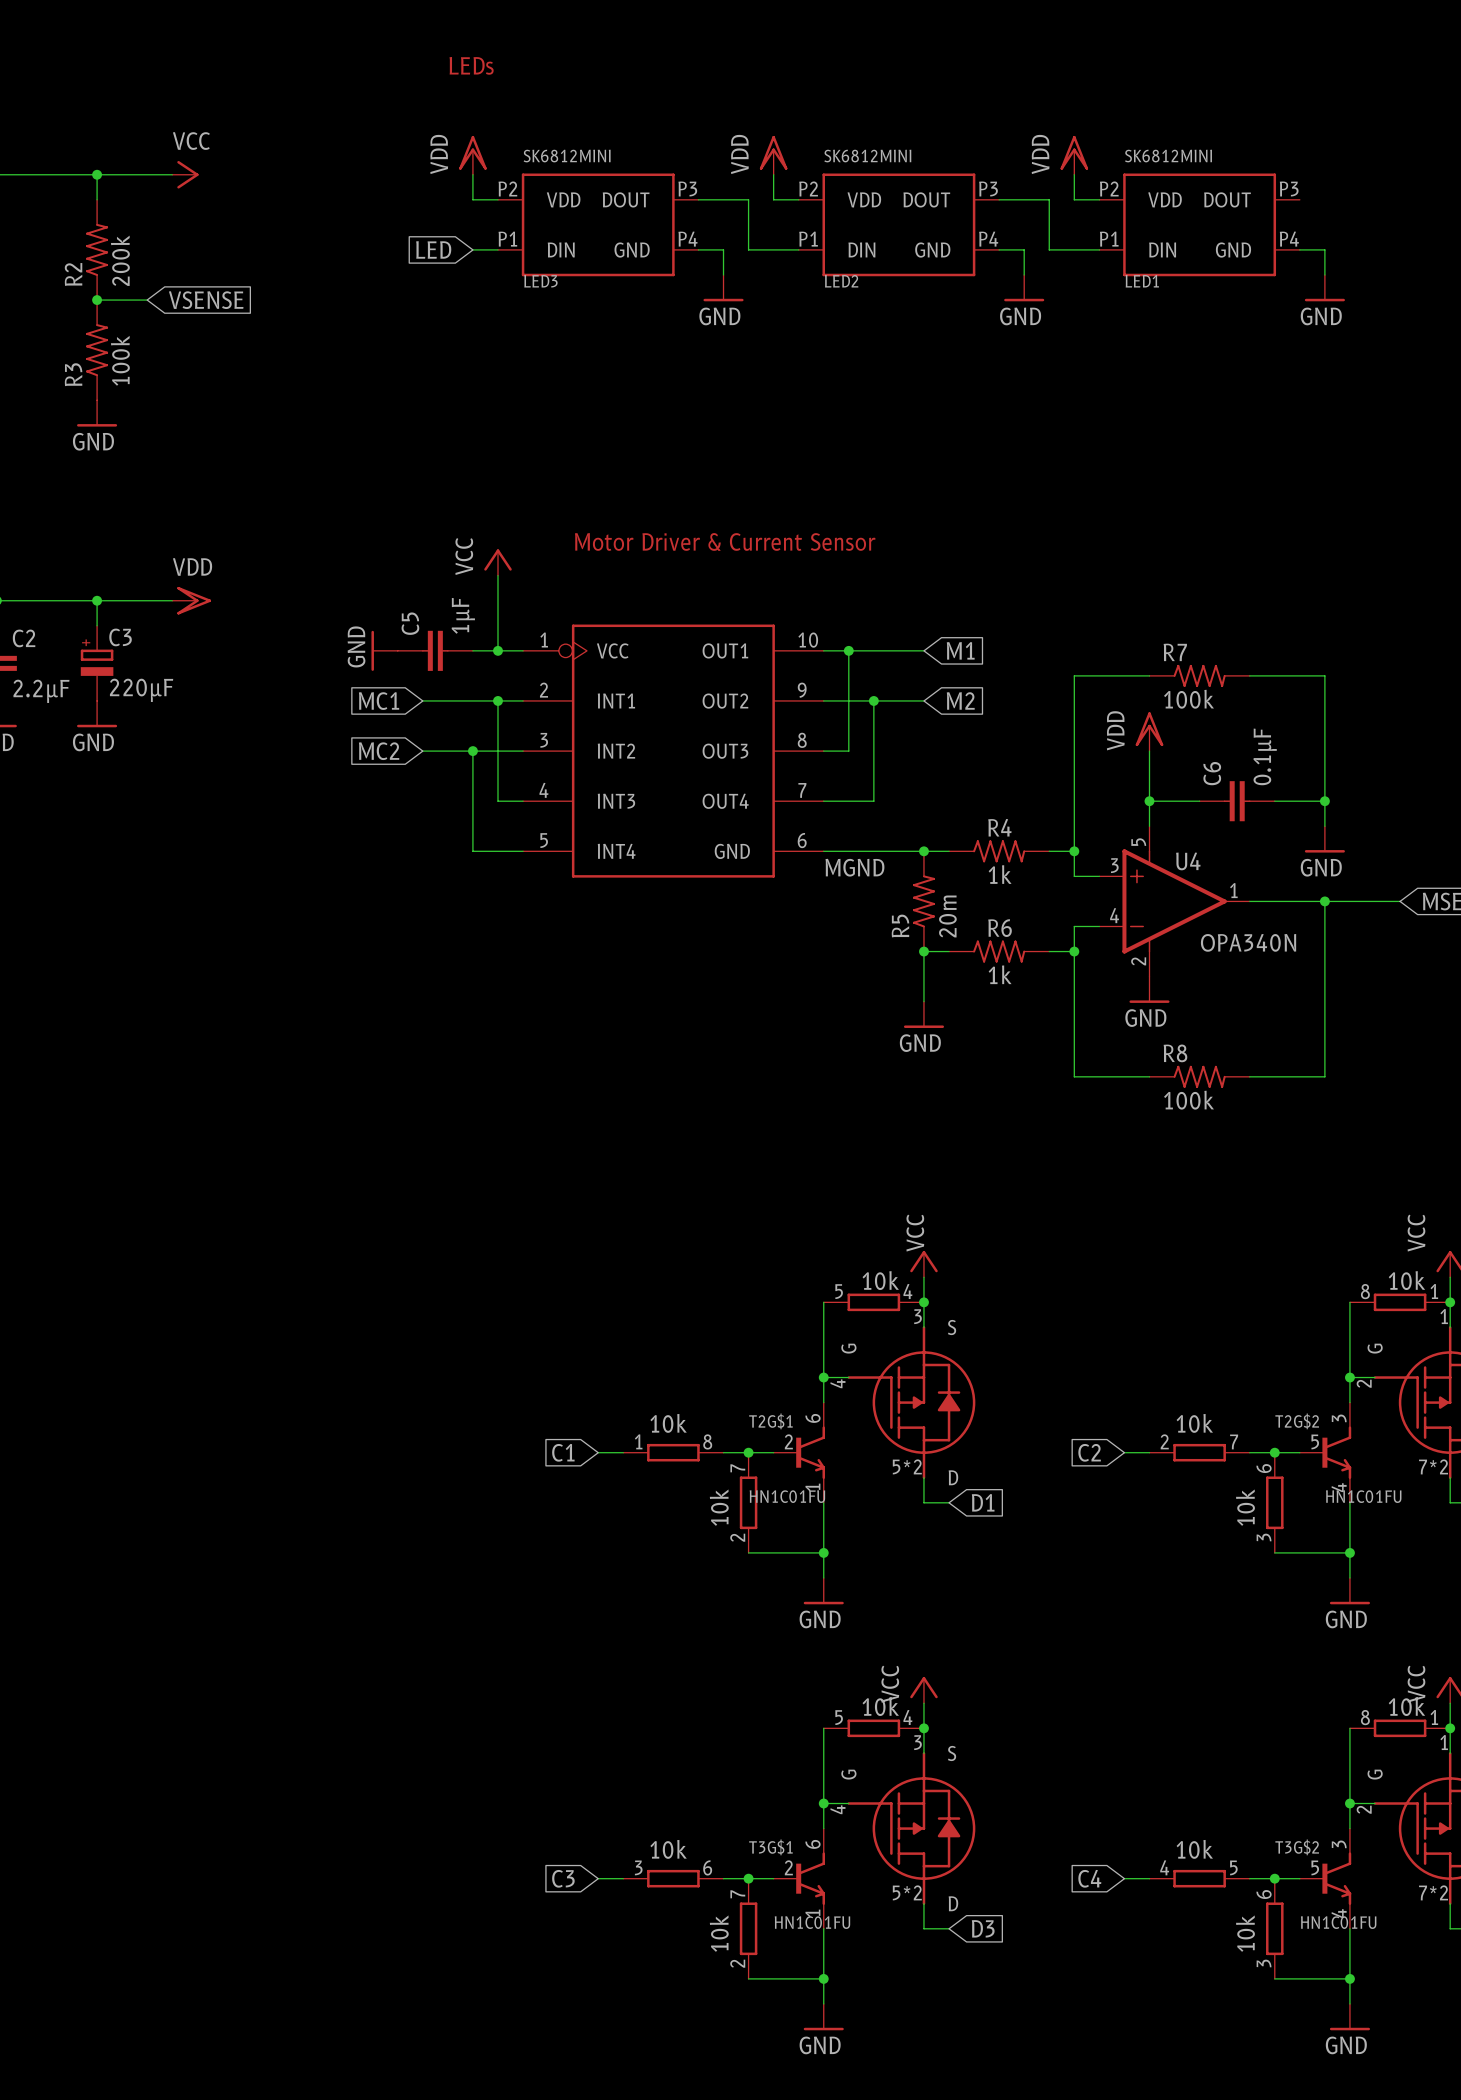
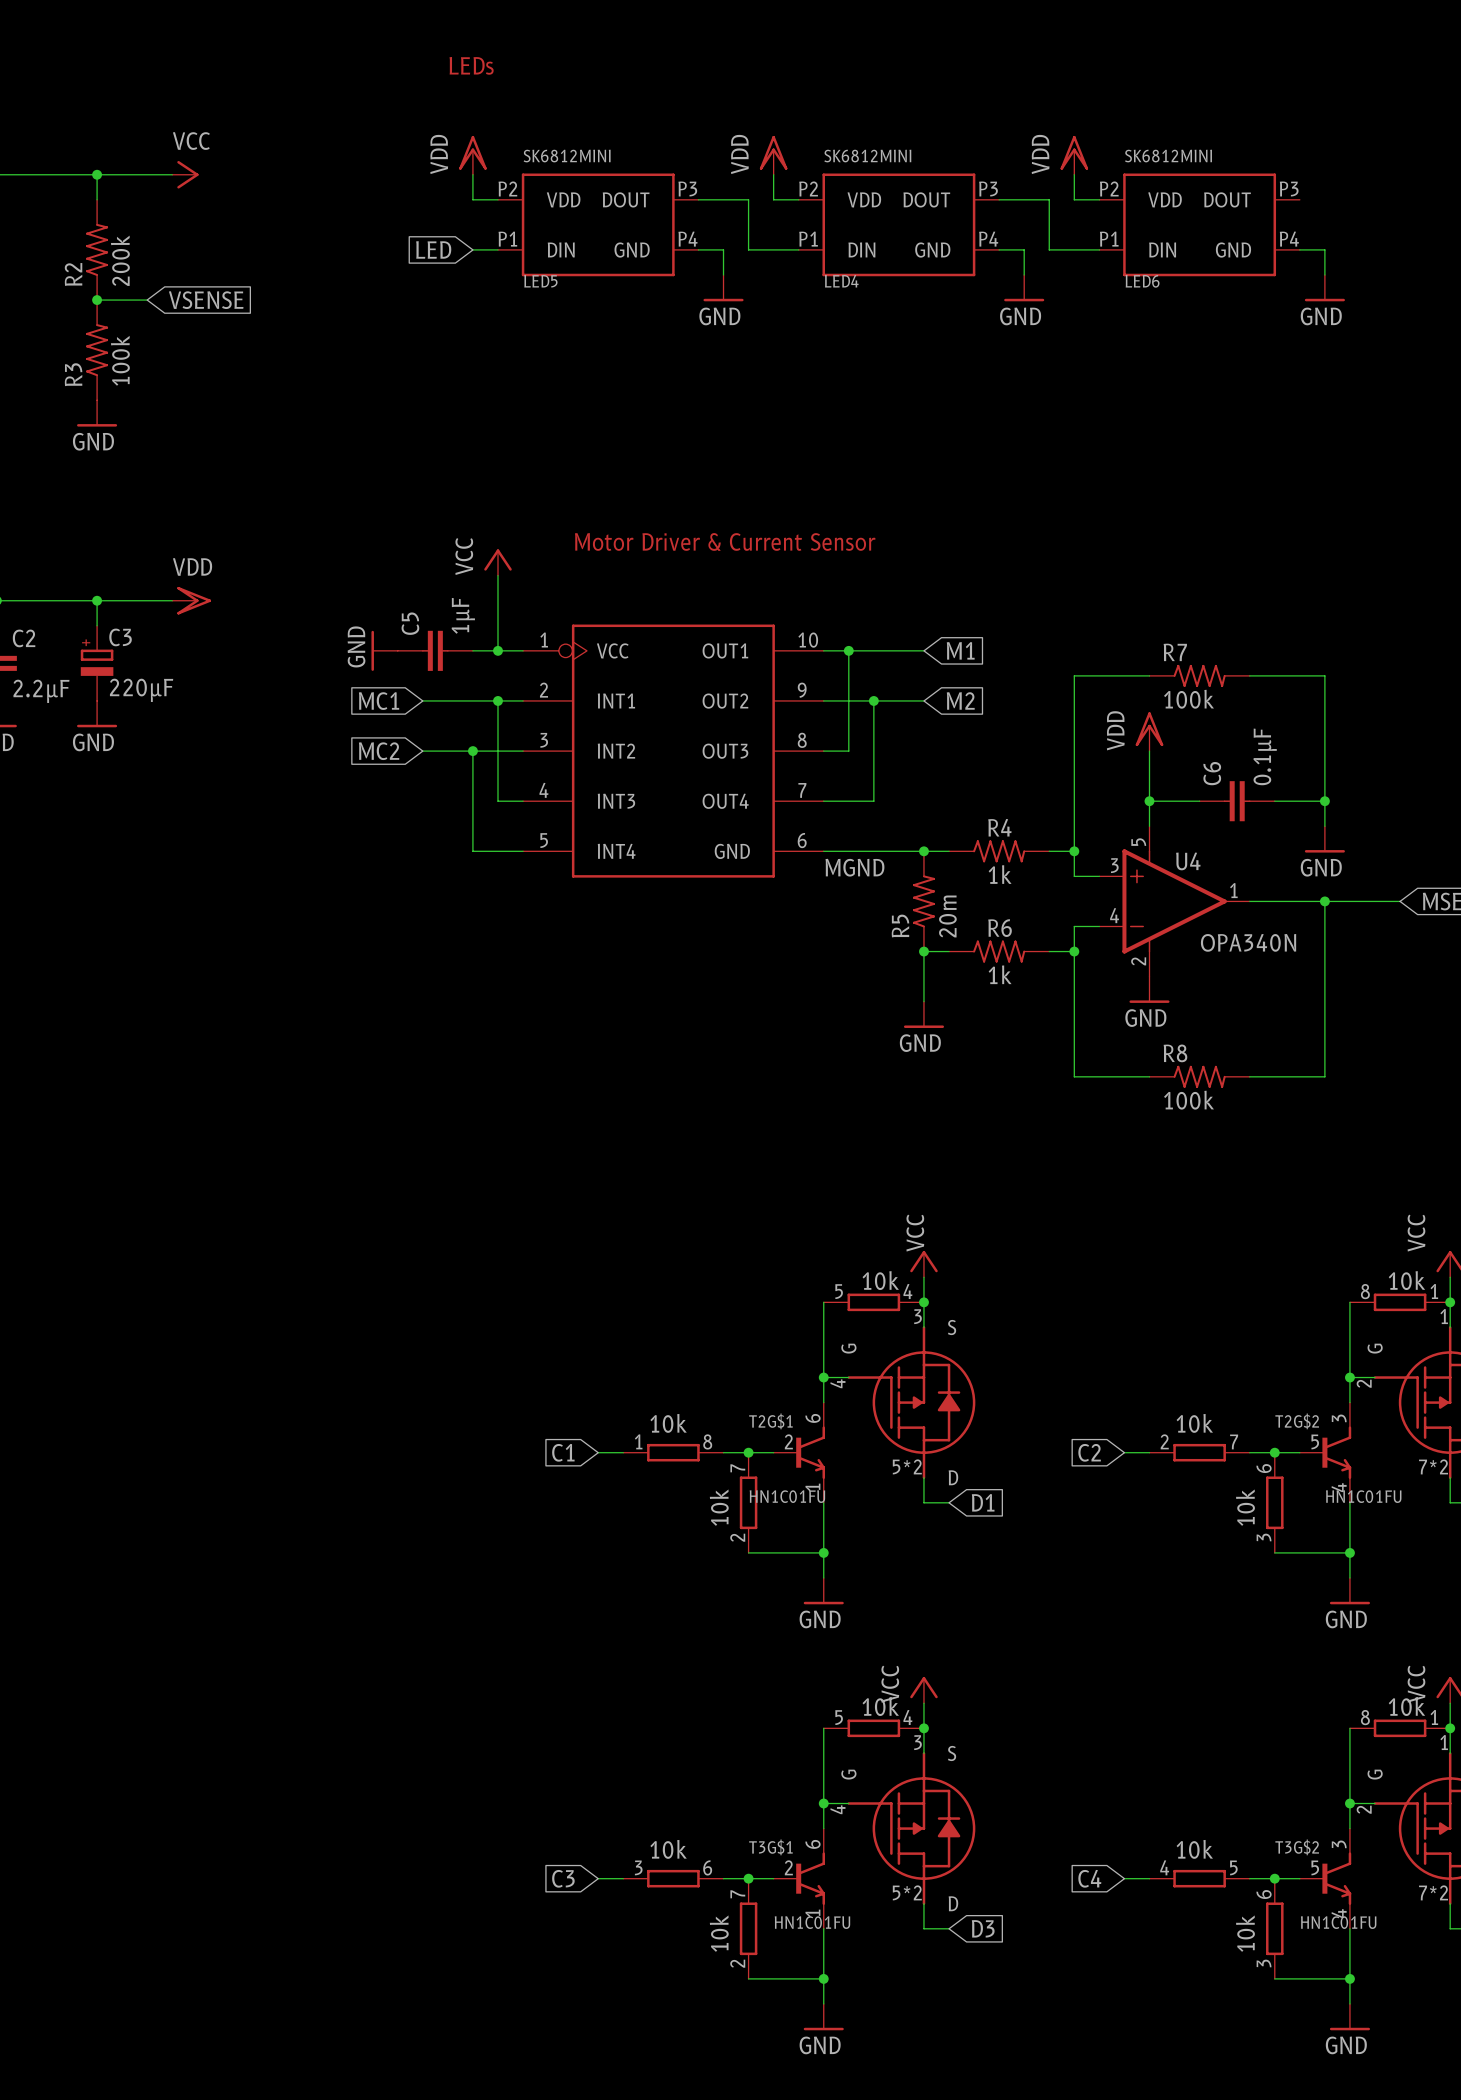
LED3 name: LED3 (540, 281) -> LED5 (540, 281)
LED2 name: LED2 (841, 281) -> LED4 (841, 281)
LED1 name: LED1 (1142, 281) -> LED6 (1142, 281)

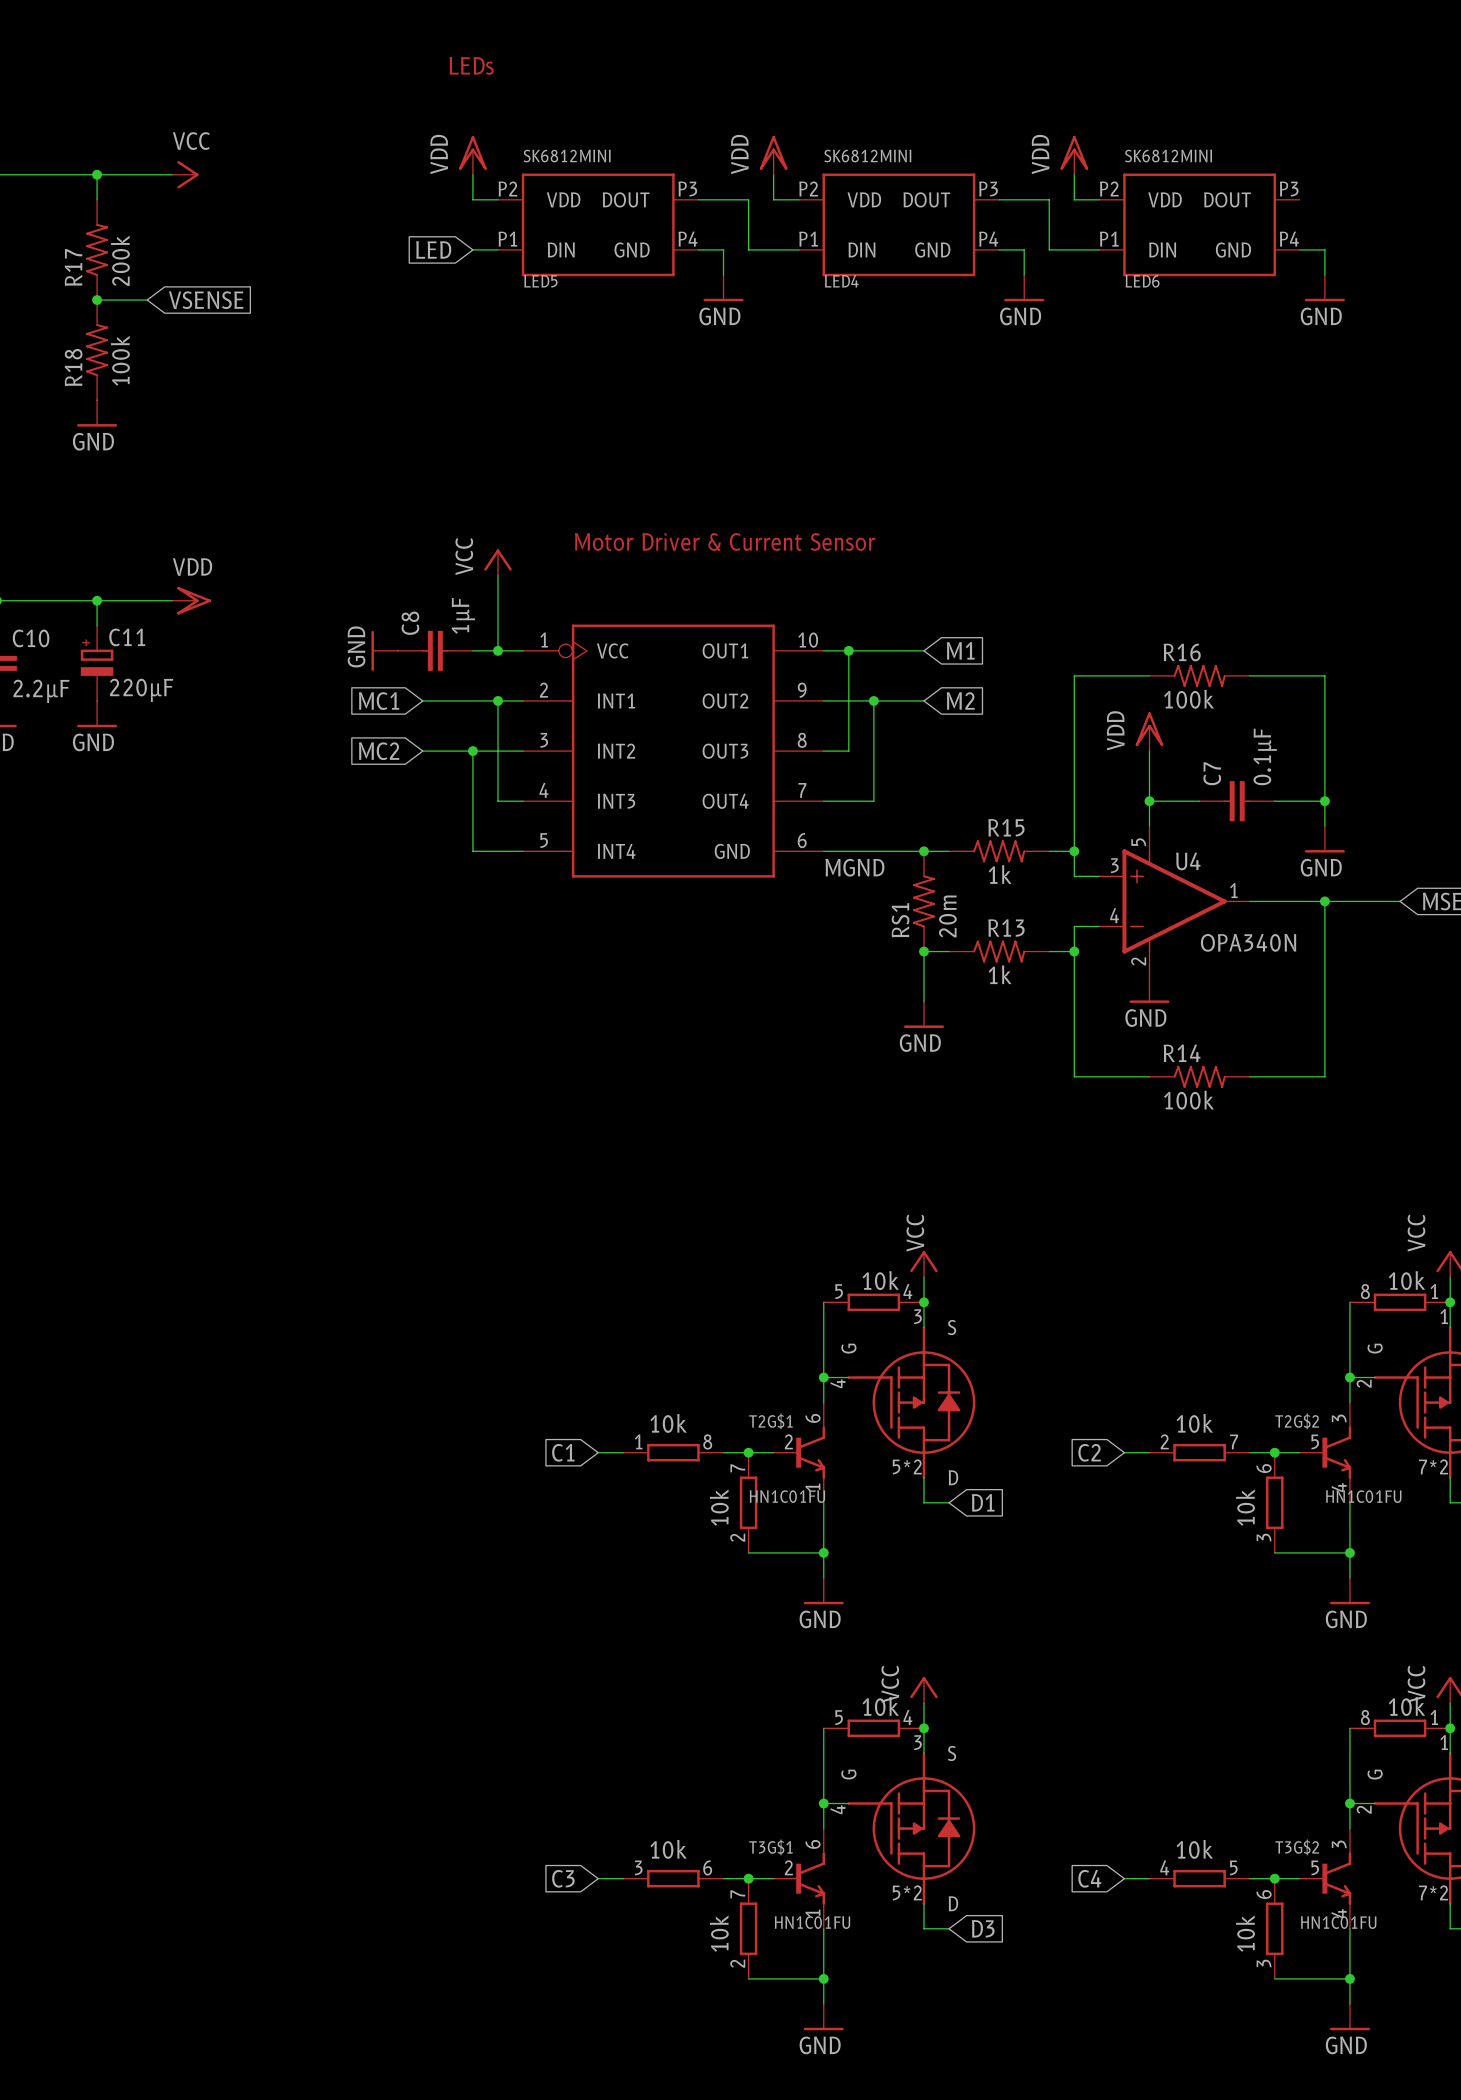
R2 name: R2 (73, 274) -> R17 (73, 267)
R3 name: R3 (73, 374) -> R18 (73, 367)
C5 name: C5 (410, 623) -> C8 (410, 623)
C3 name: C3 (120, 637) -> C11 (127, 637)
C2 name: C2 (24, 638) -> C10 (31, 638)
R7 name: R7 (1175, 652) -> R16 (1182, 652)
C6 name: C6 (1212, 773) -> C7 (1212, 773)
R4 name: R4 (999, 827) -> R15 (1006, 827)
R5 name: R5 (900, 926) -> RS1 (900, 920)
R6 name: R6 (1000, 928) -> R13 (1006, 927)
R8 name: R8 (1175, 1053) -> R14 (1182, 1053)

